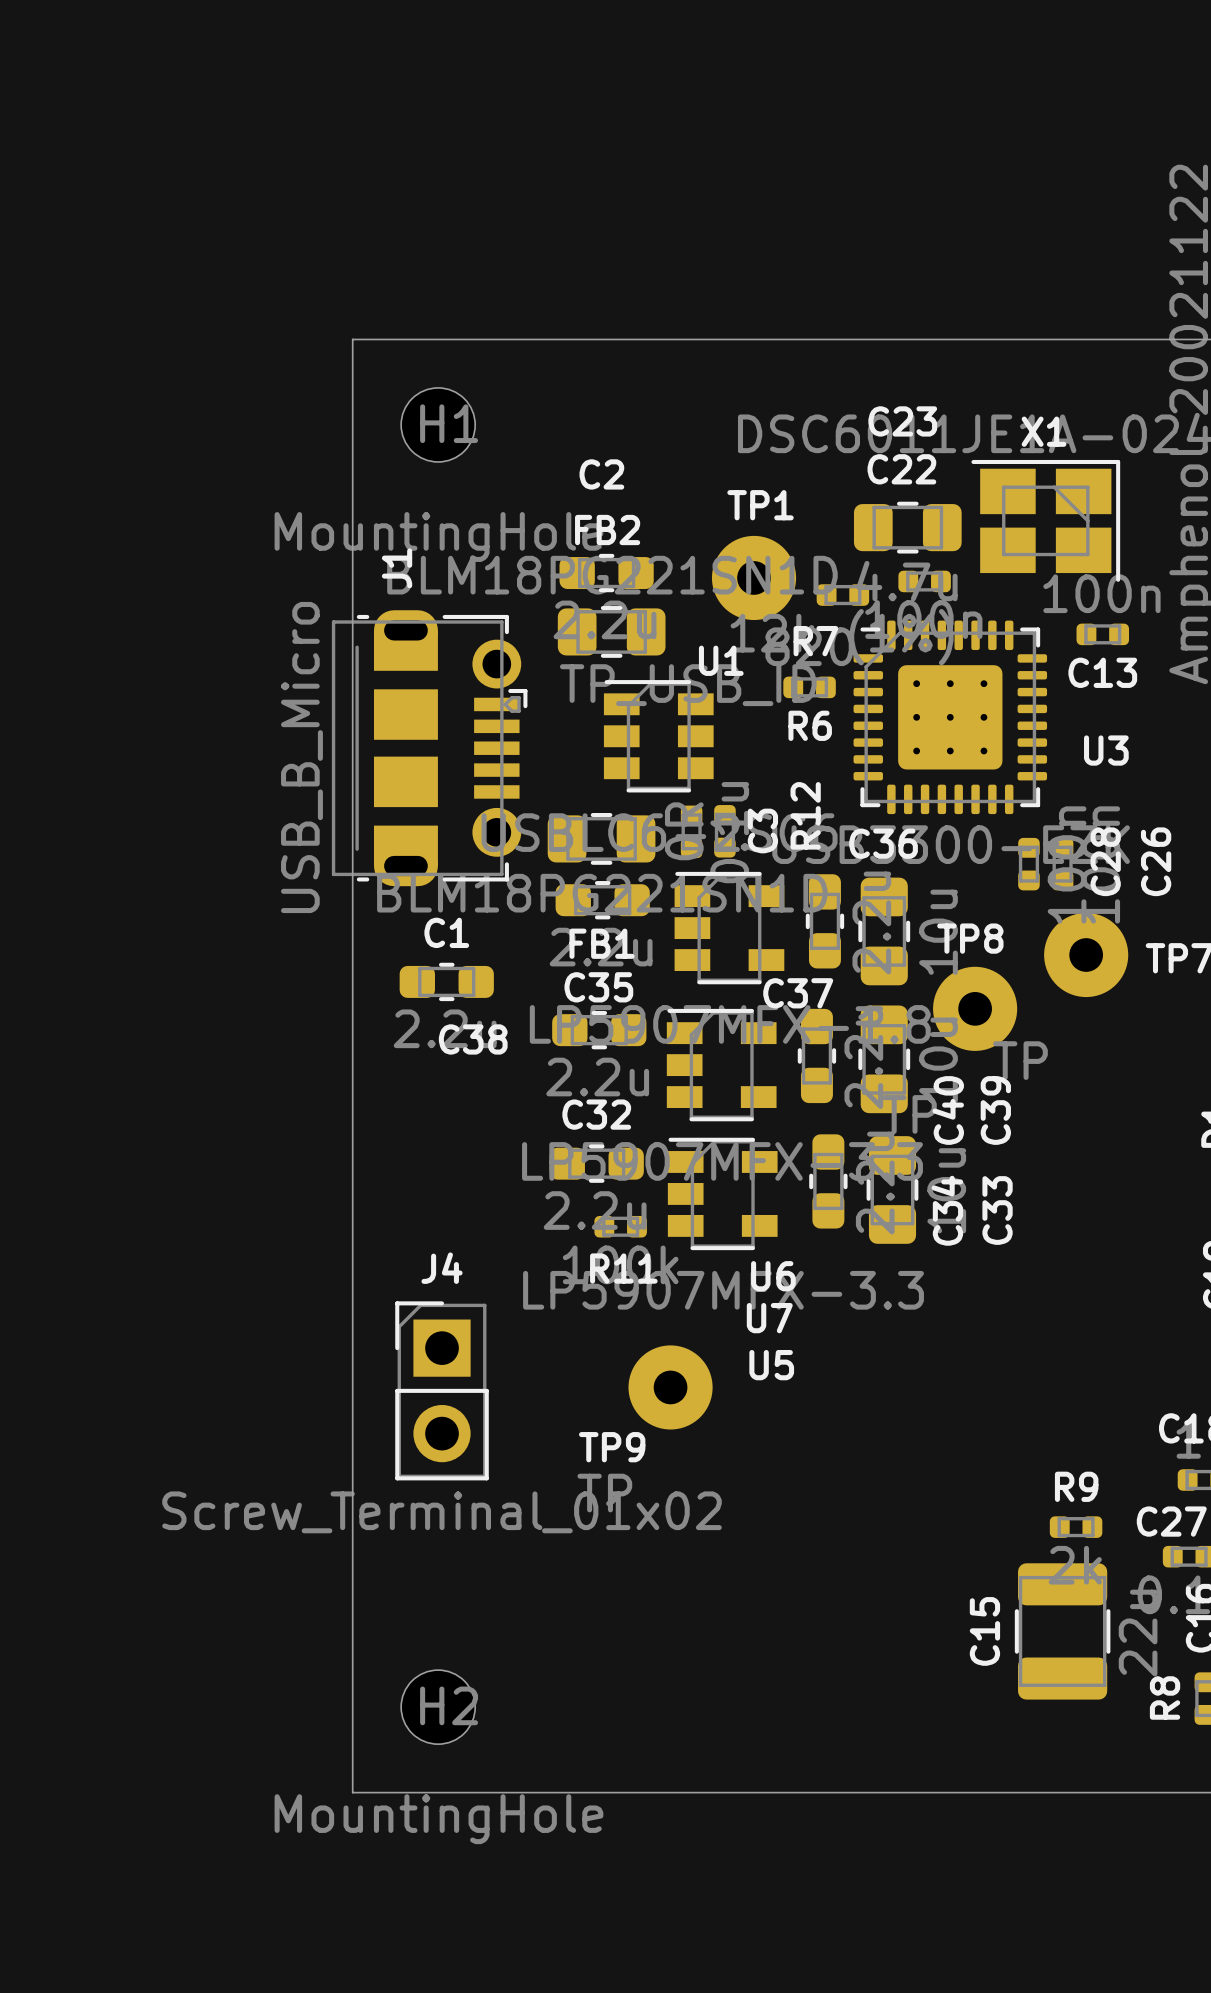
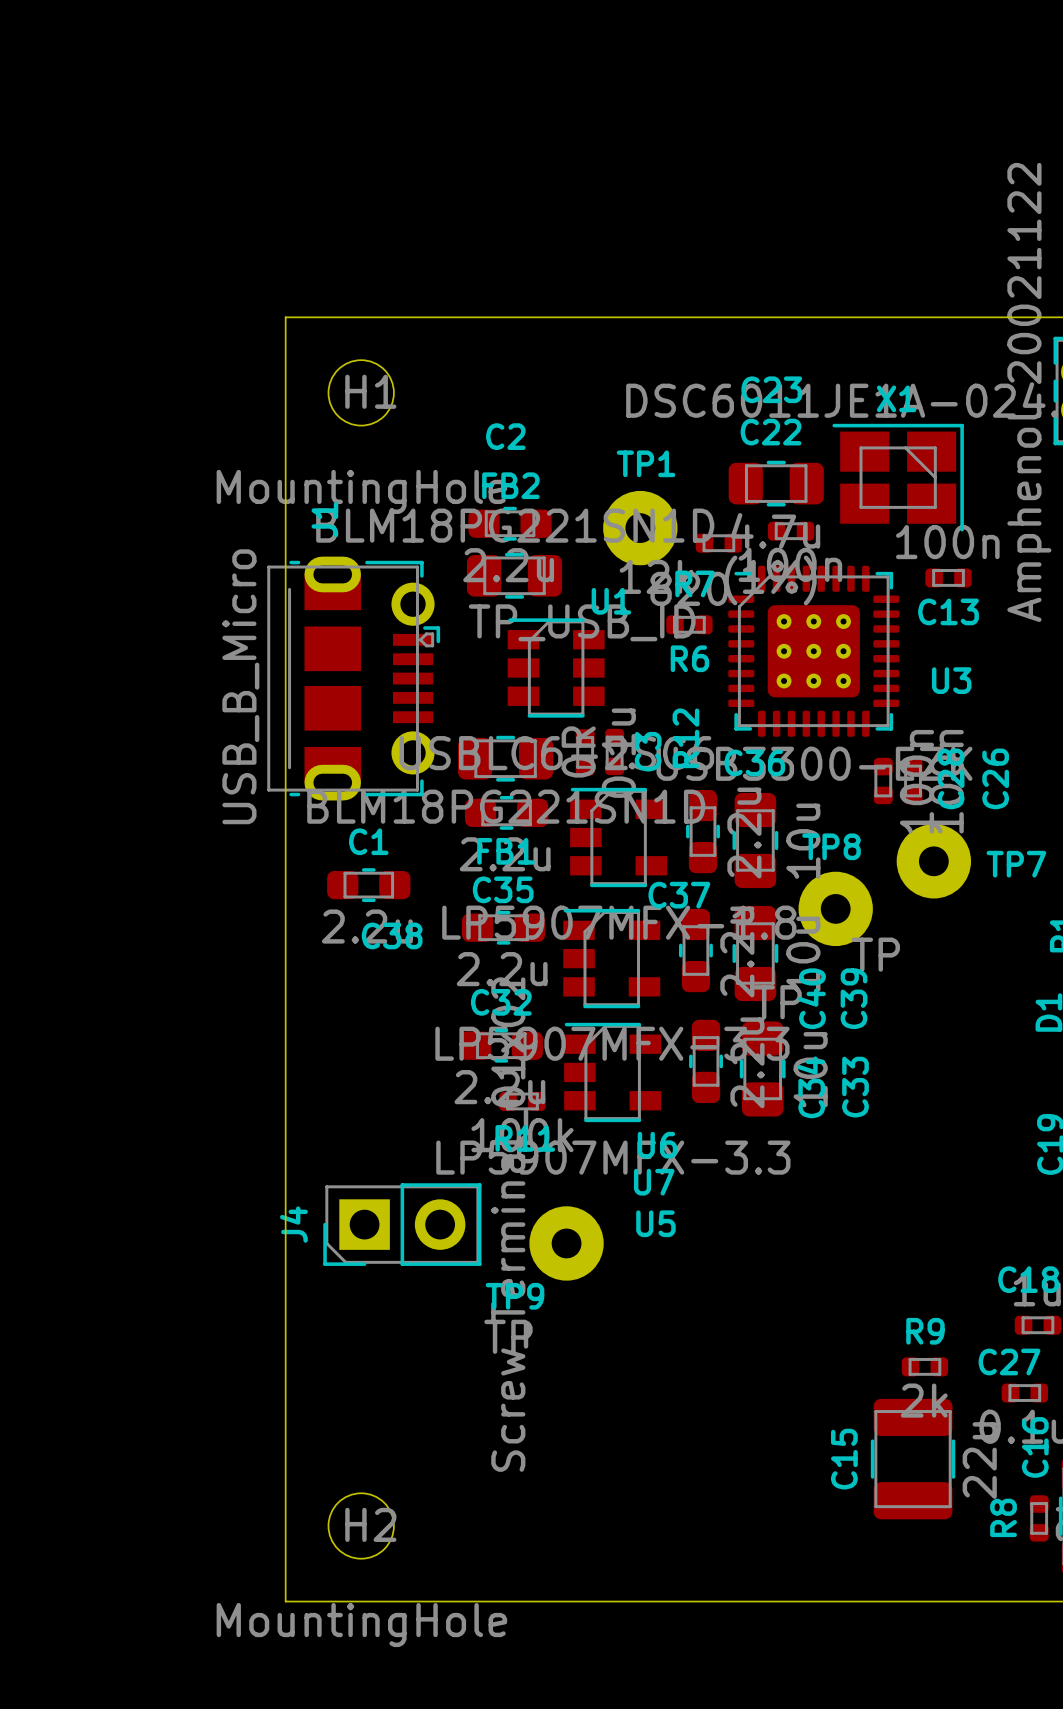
J4 rotation: 0° (442, 1390) -> 90° counterclockwise (402, 1224)

